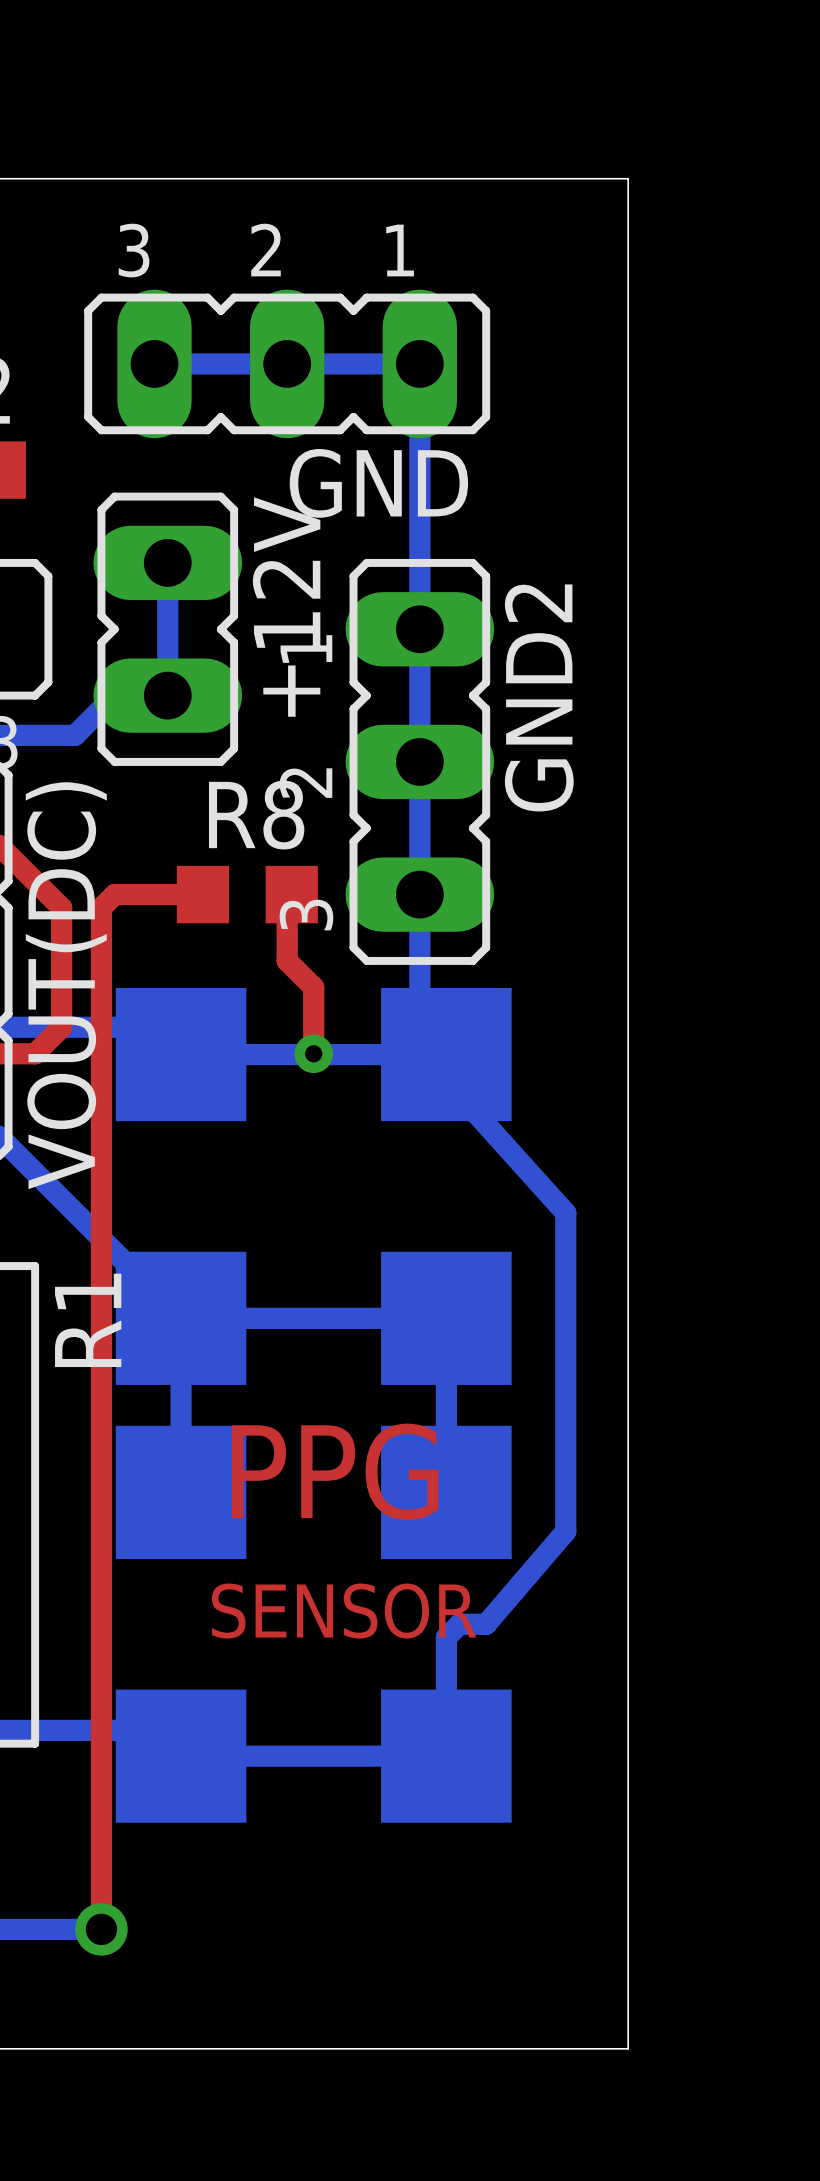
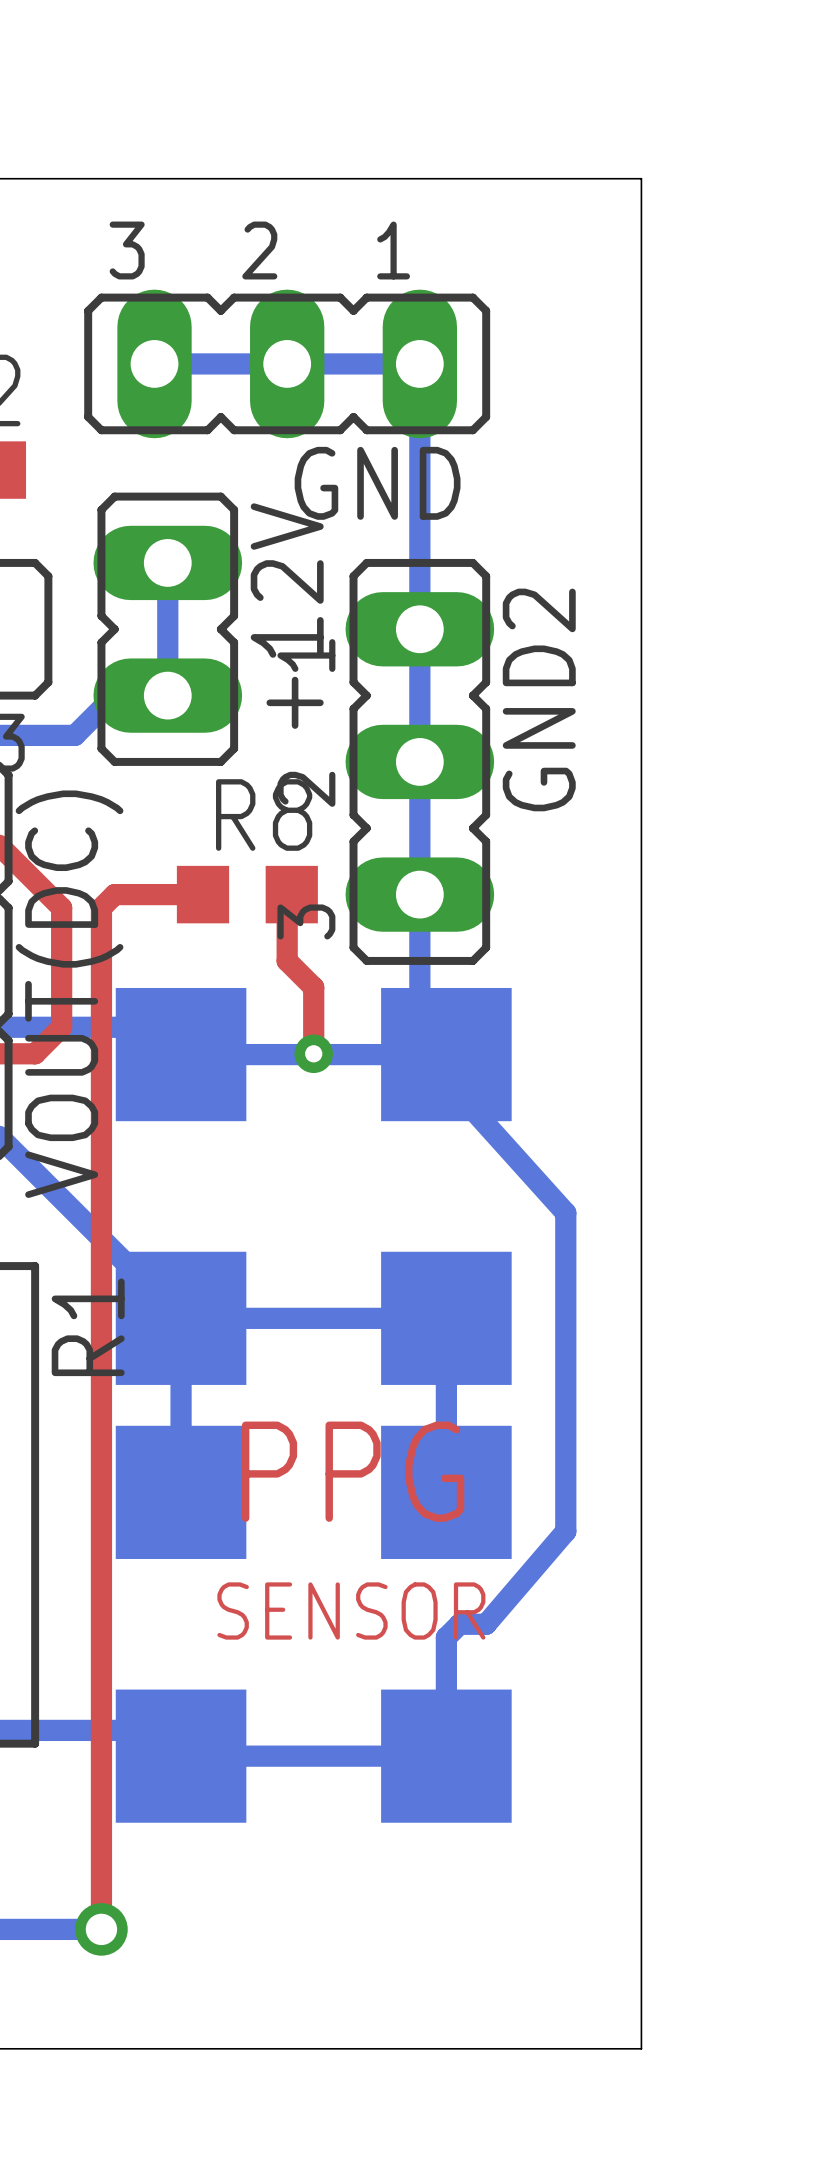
board edge: (628, 178) (628, 2048) -> (628, 178) (641, 178) (641, 2048) (628, 2048)

